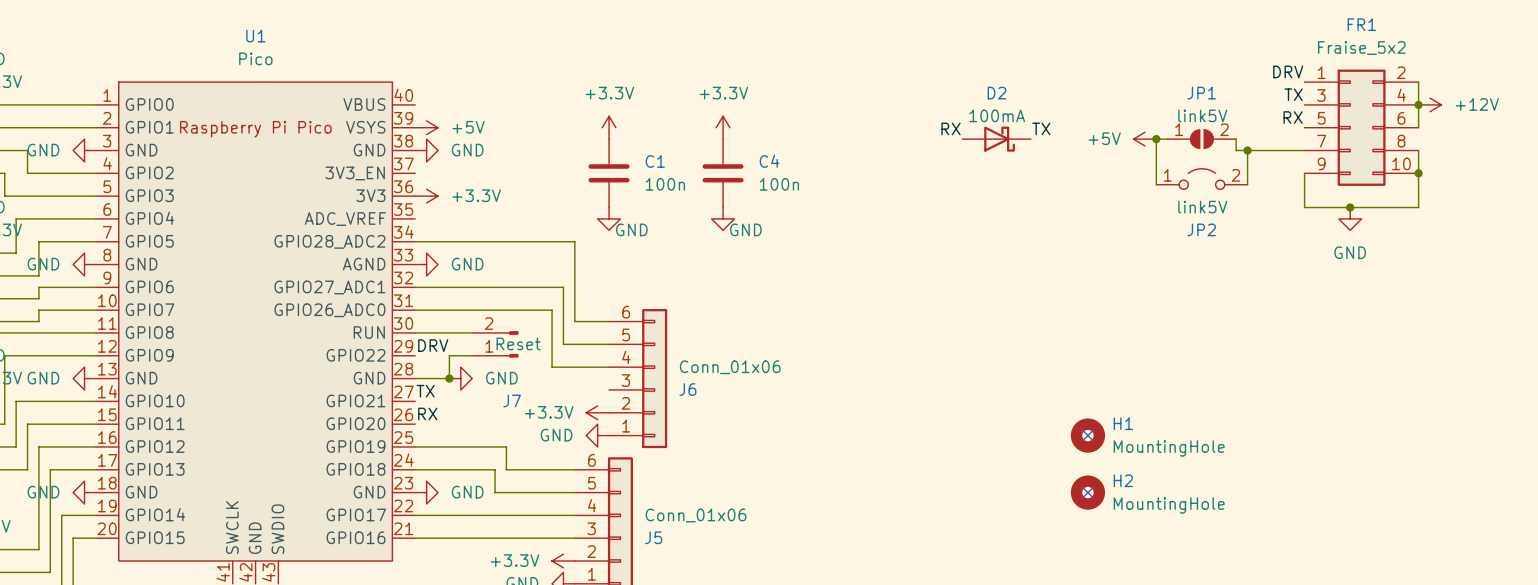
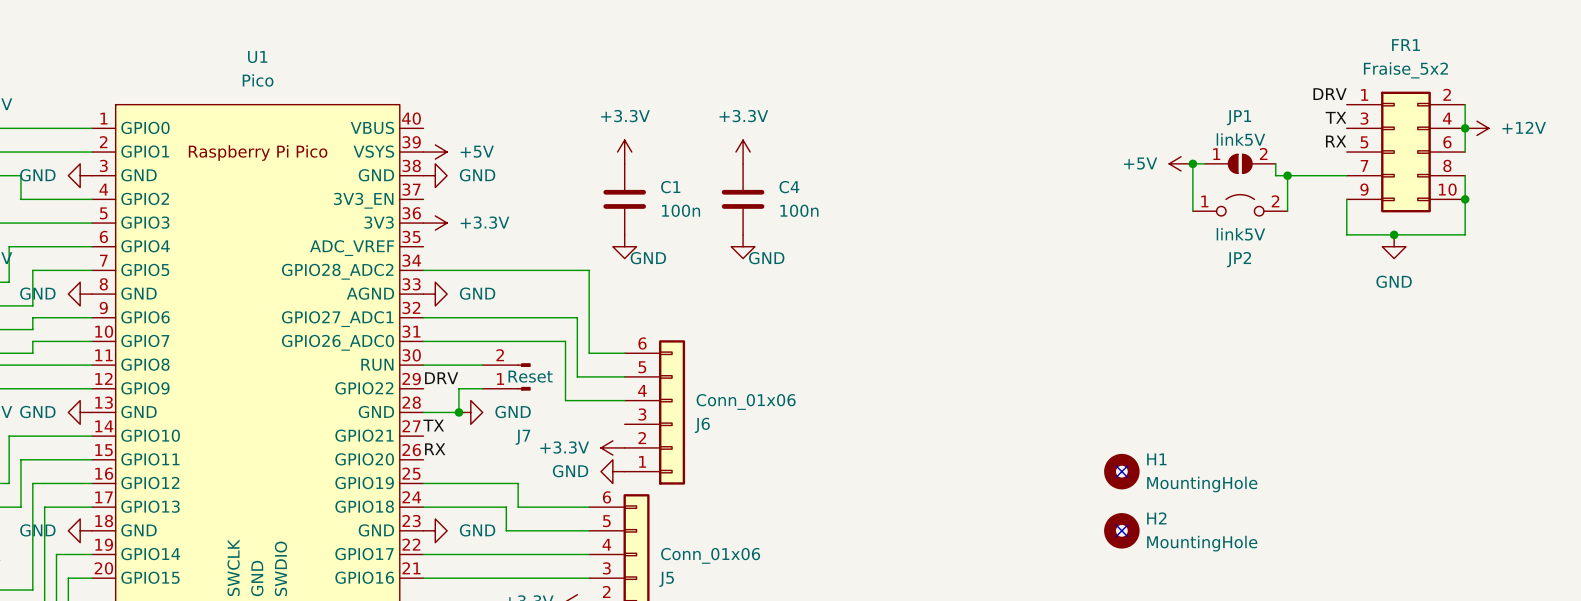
label: RX (951, 128) -> none
label: TX (1041, 128) -> none
D2: 100mA (996, 139) -> none

